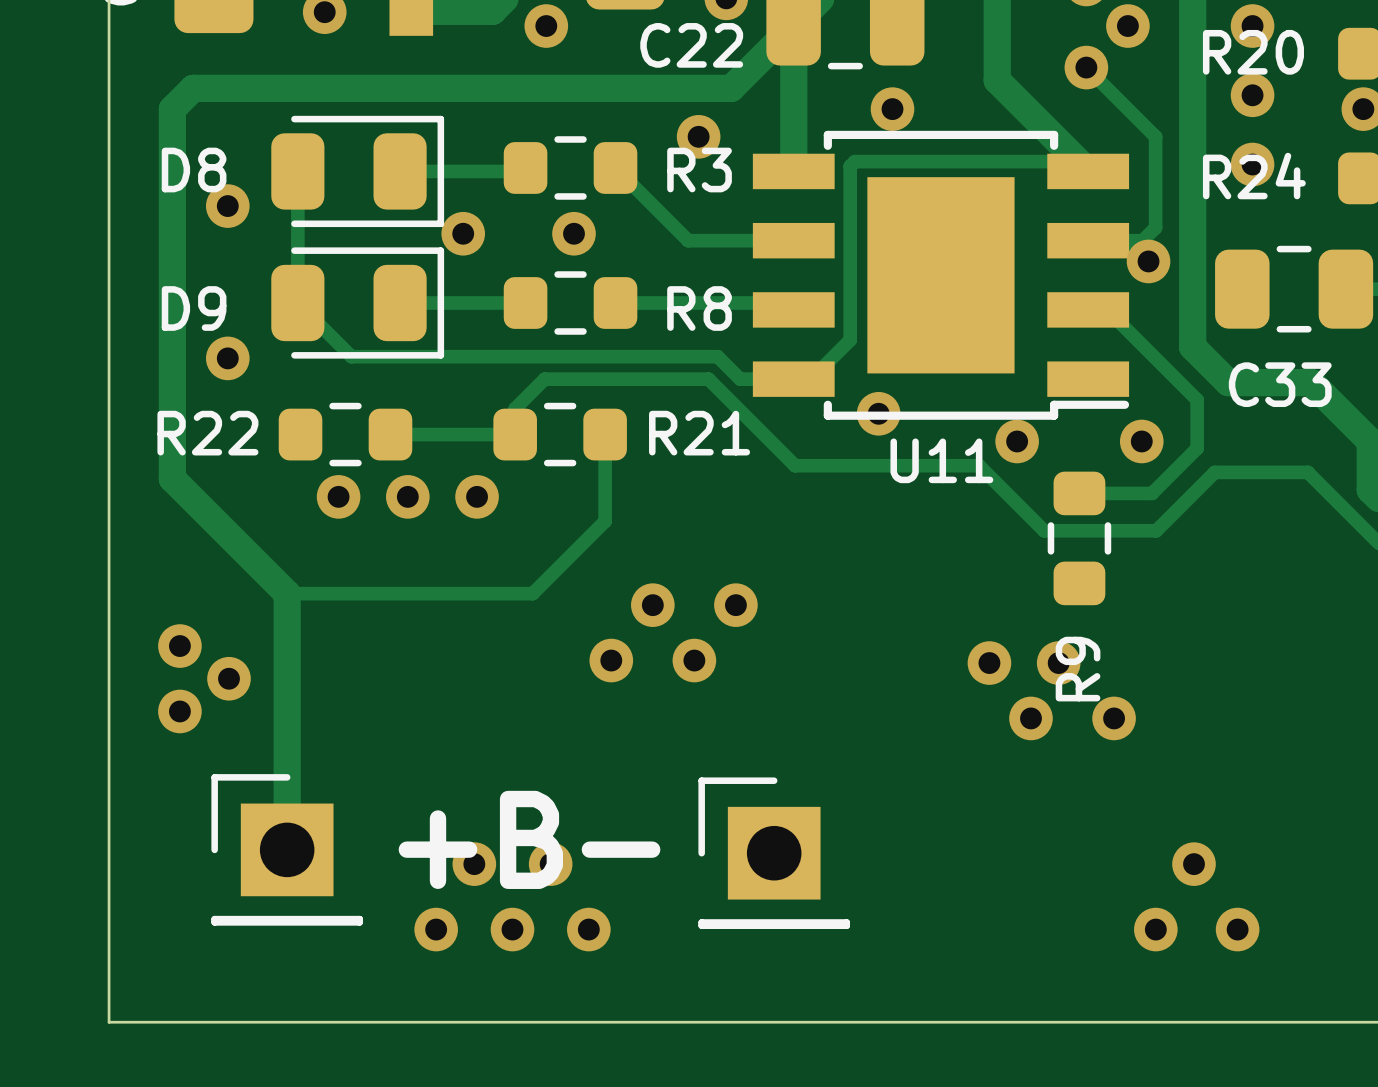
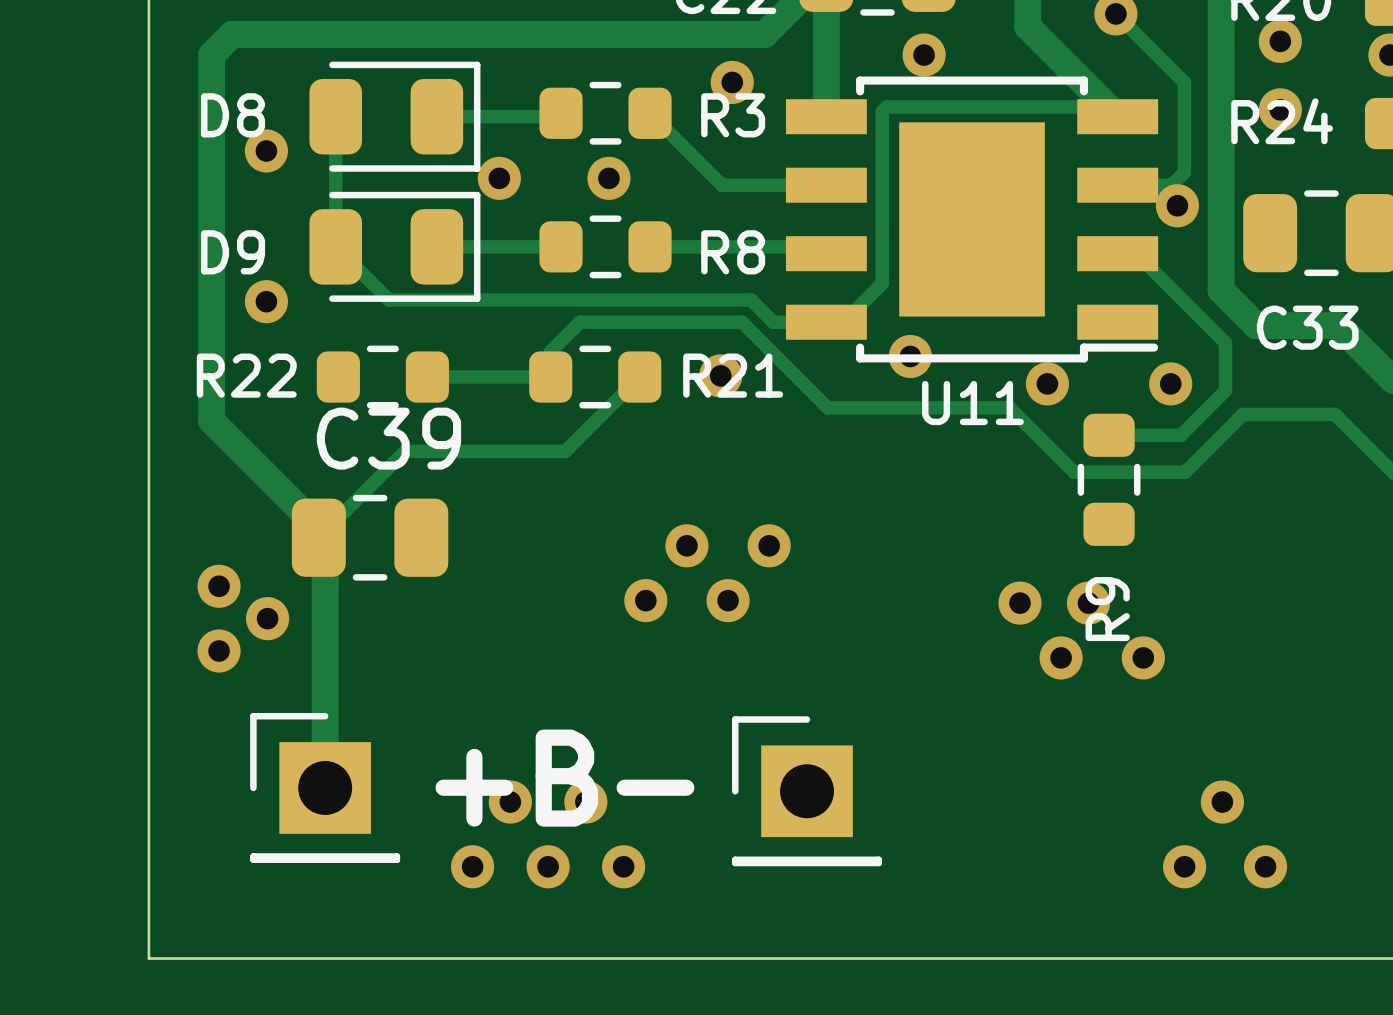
via: none -> (720, 375)
track: (605, 434) (605, 521) (532, 593) (287, 593) -> (639, 377) (565, 451) (405, 451) (318, 537)
via: (338, 496) -> none
via: (407, 496) -> none
via: (477, 496) -> none
C39: none -> (370, 537)

